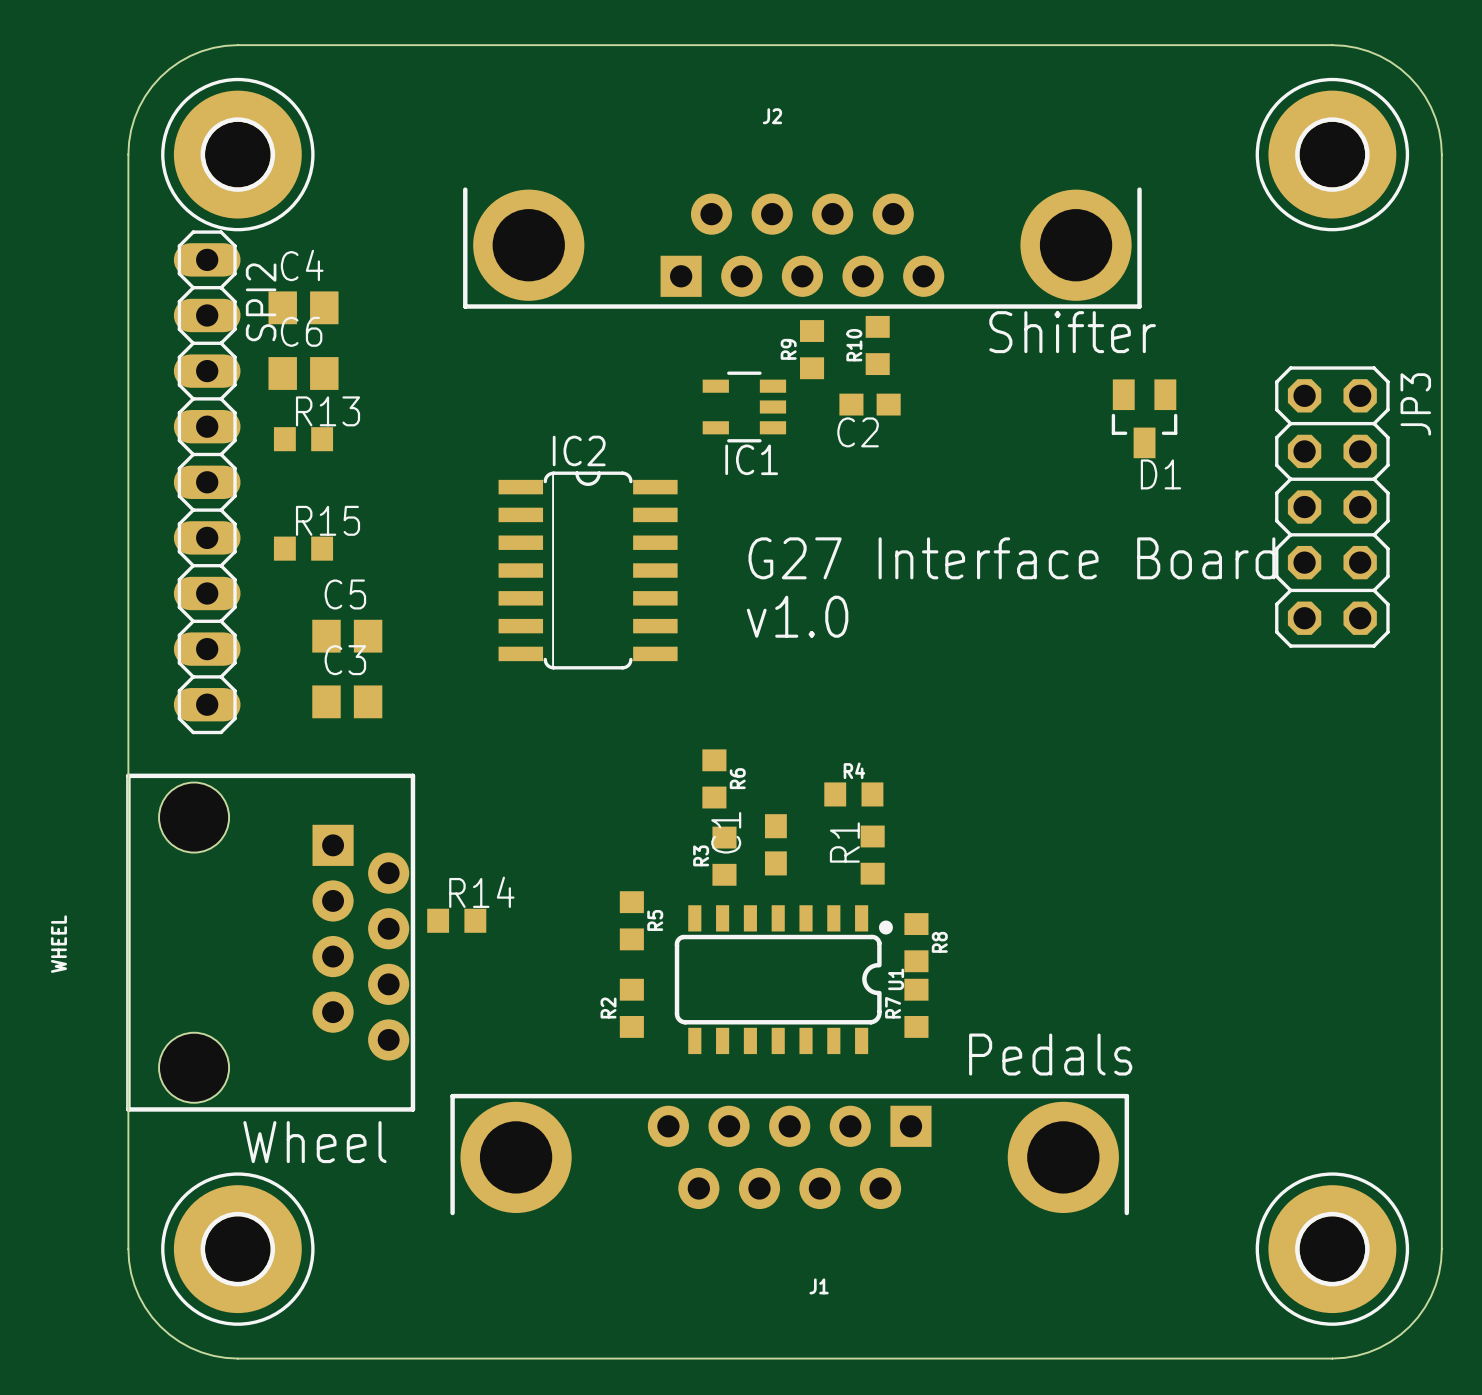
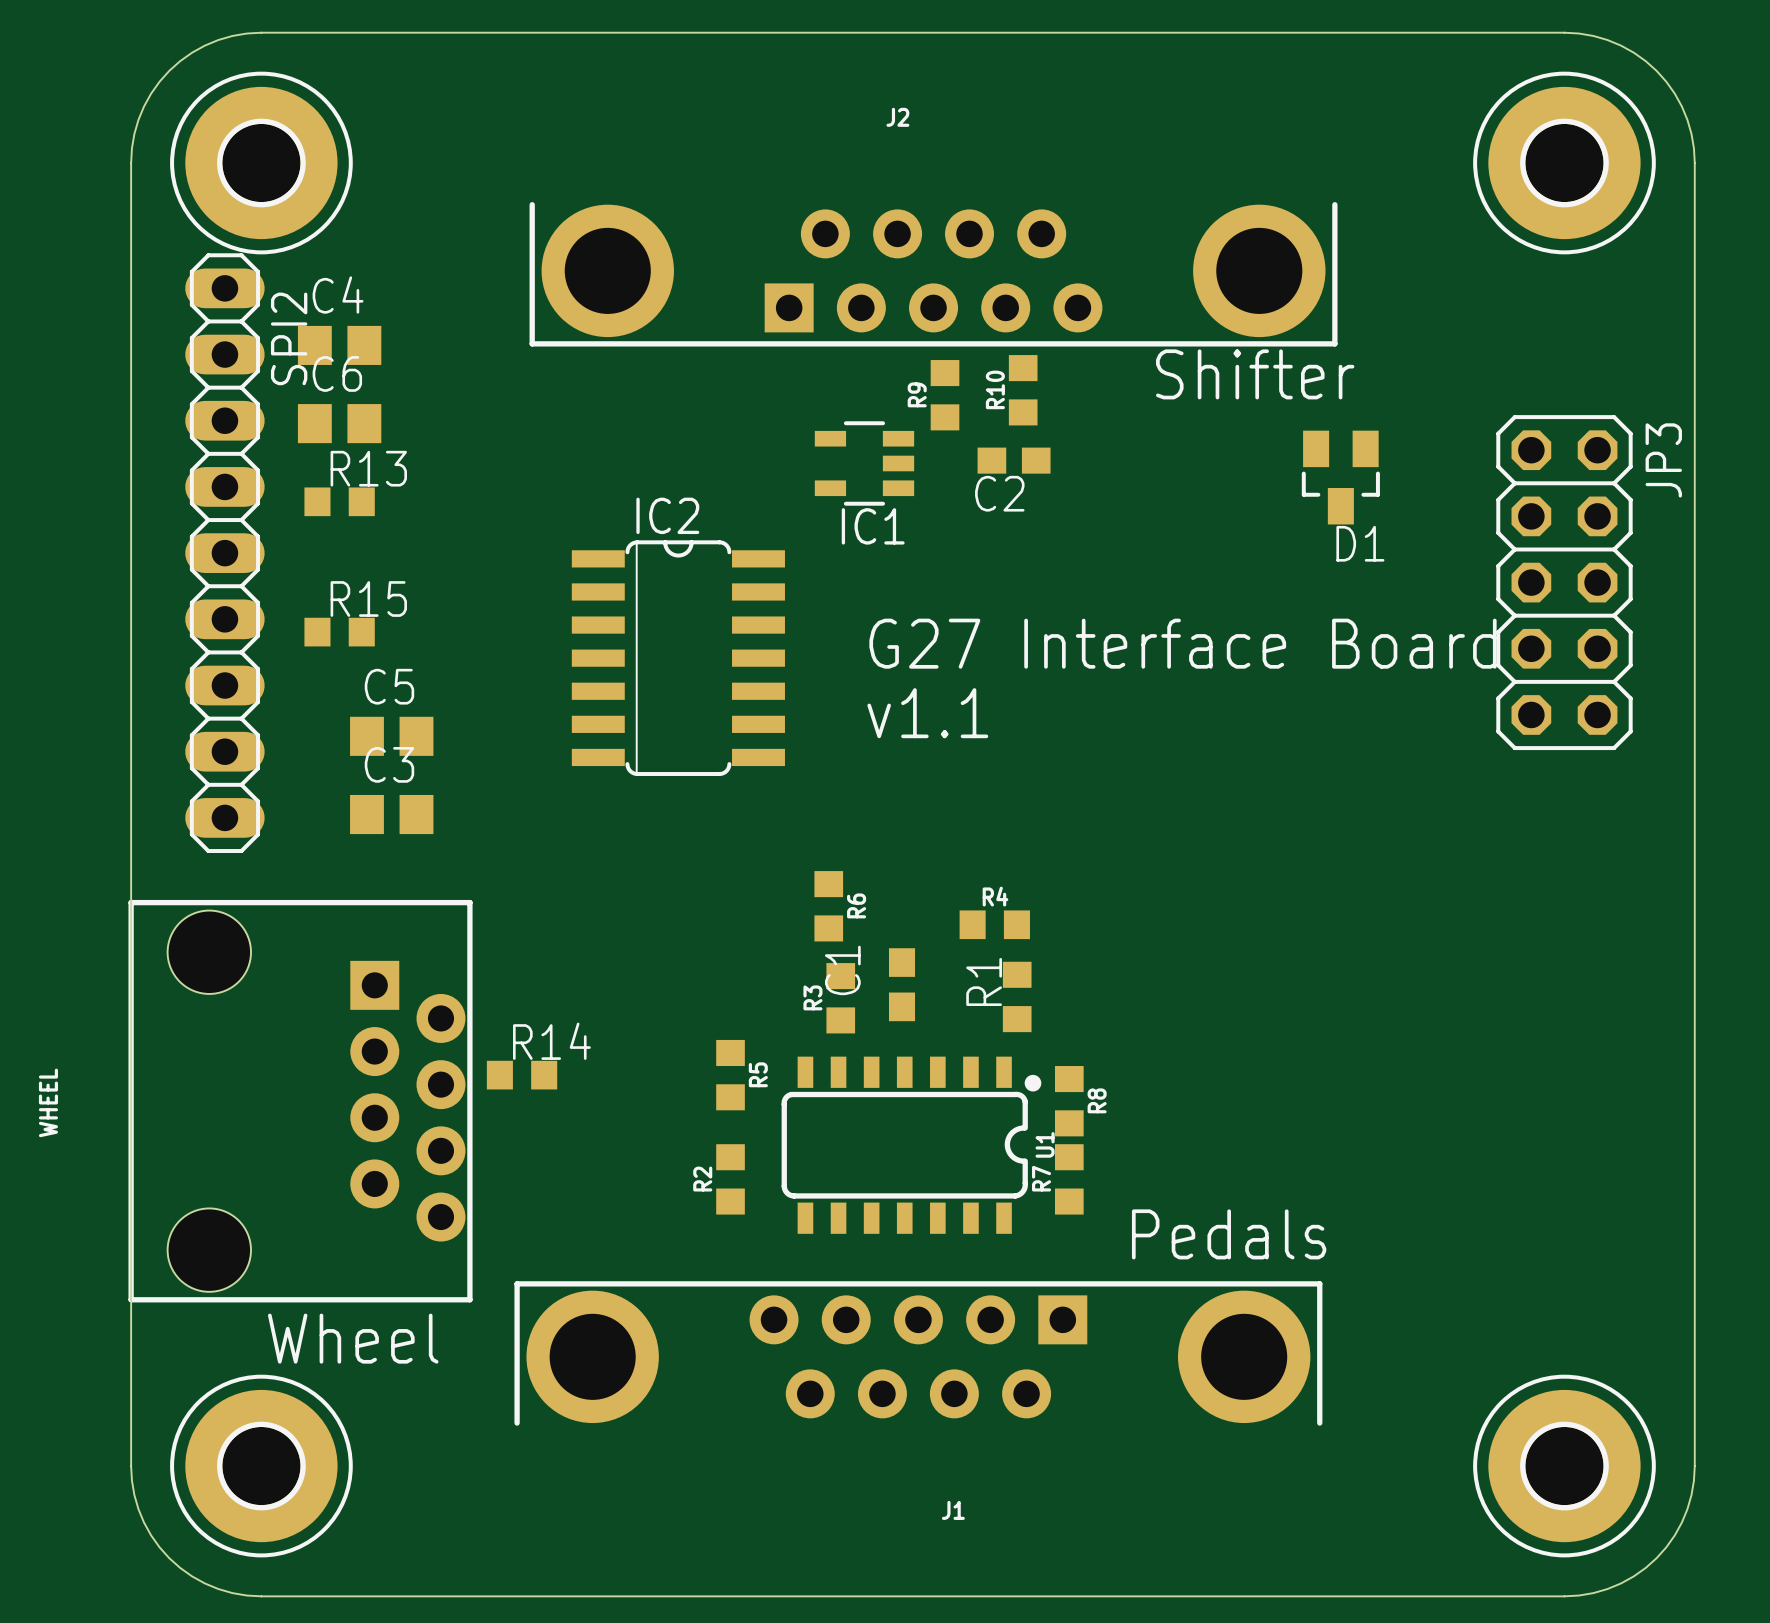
text: v1.0 (797, 616) -> v1.1 (927, 713)

